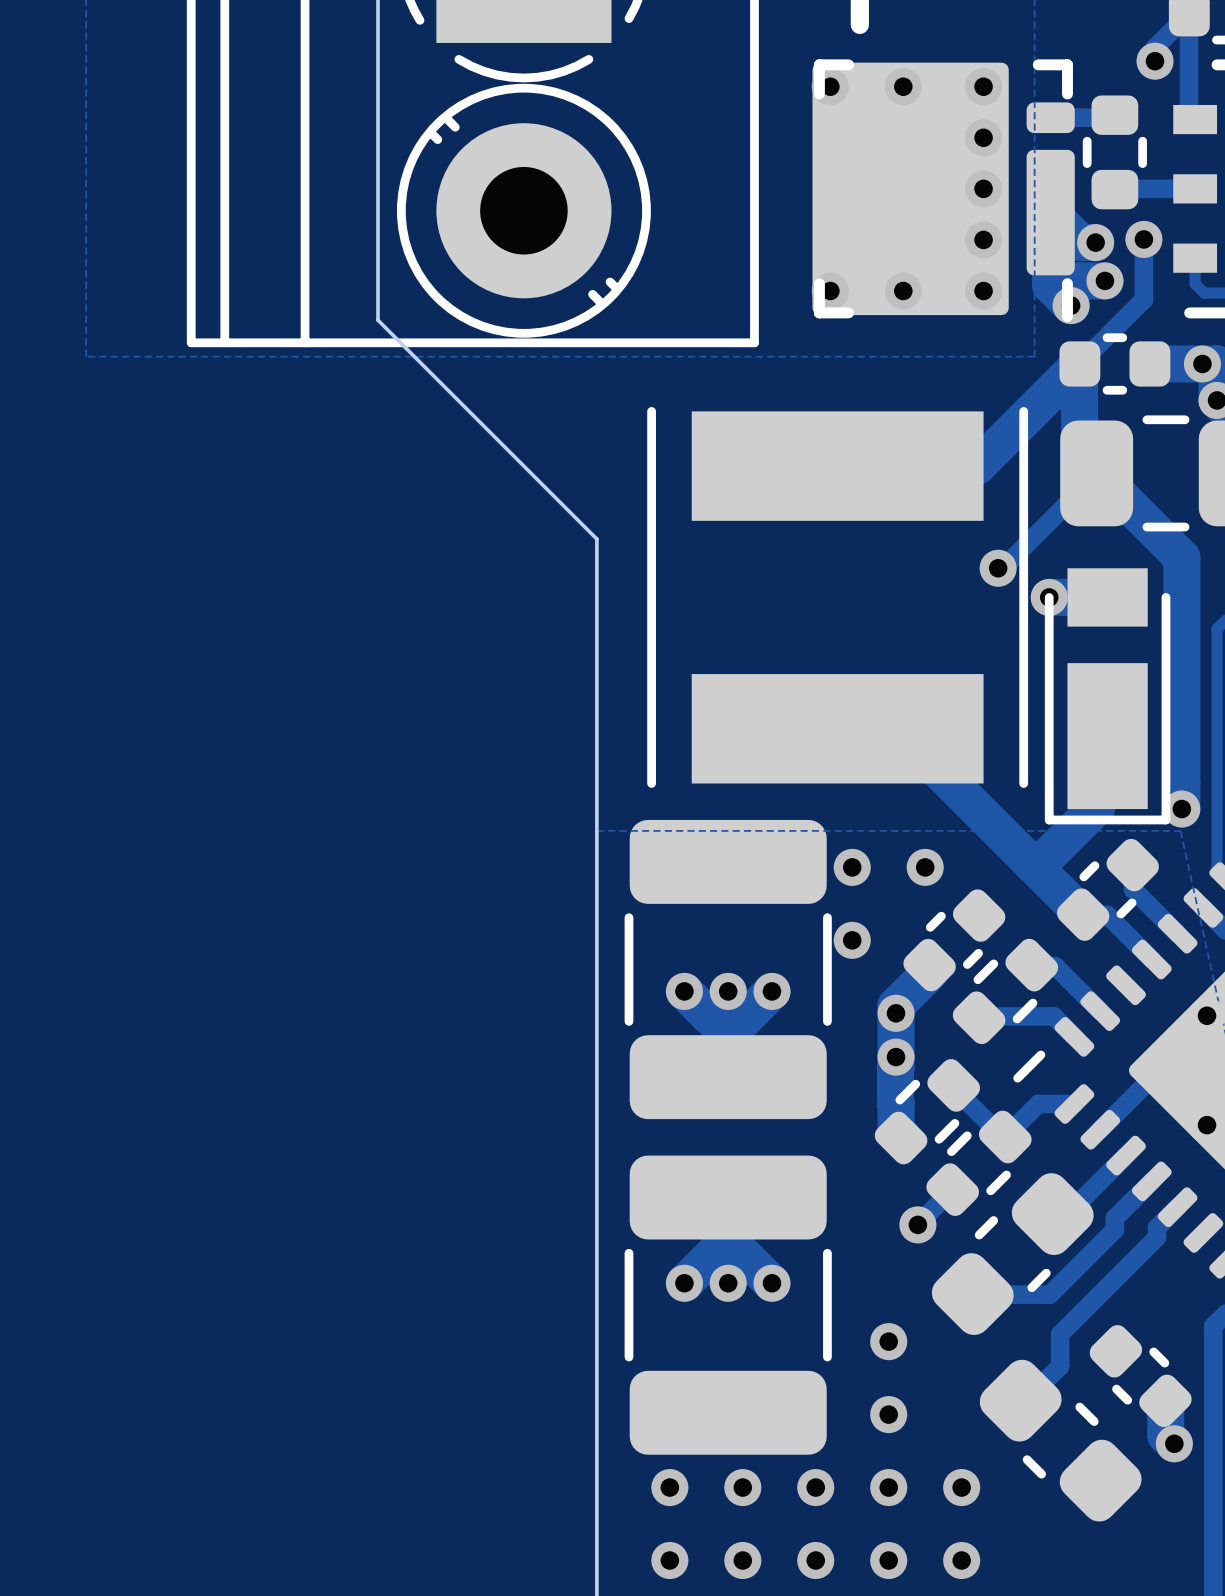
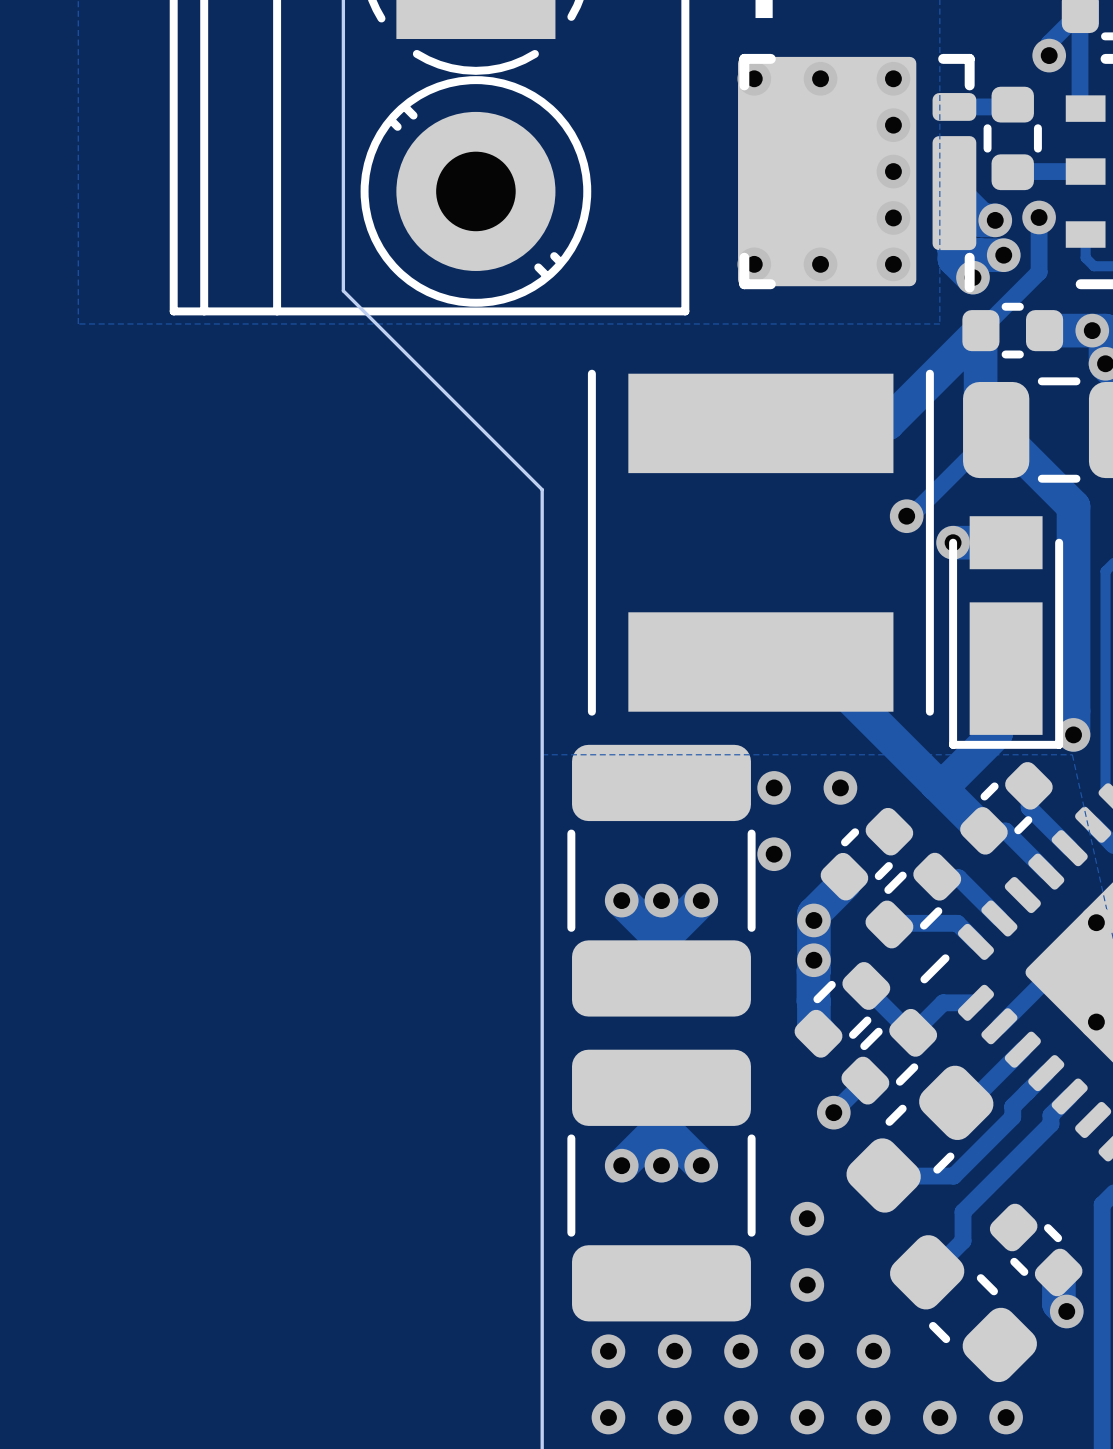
via: none -> (939, 1417)
via: none -> (1006, 1417)

